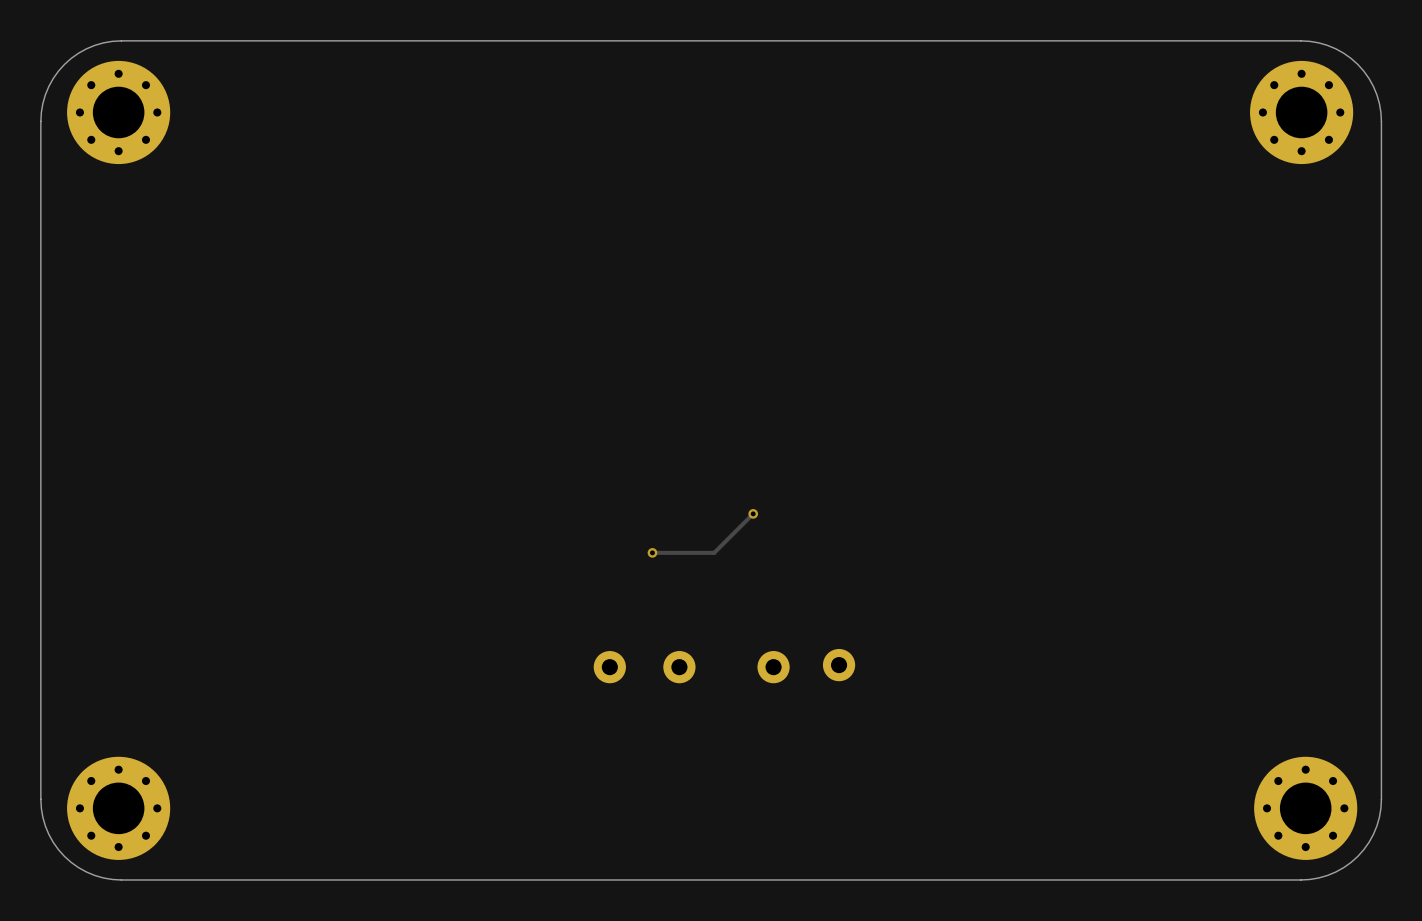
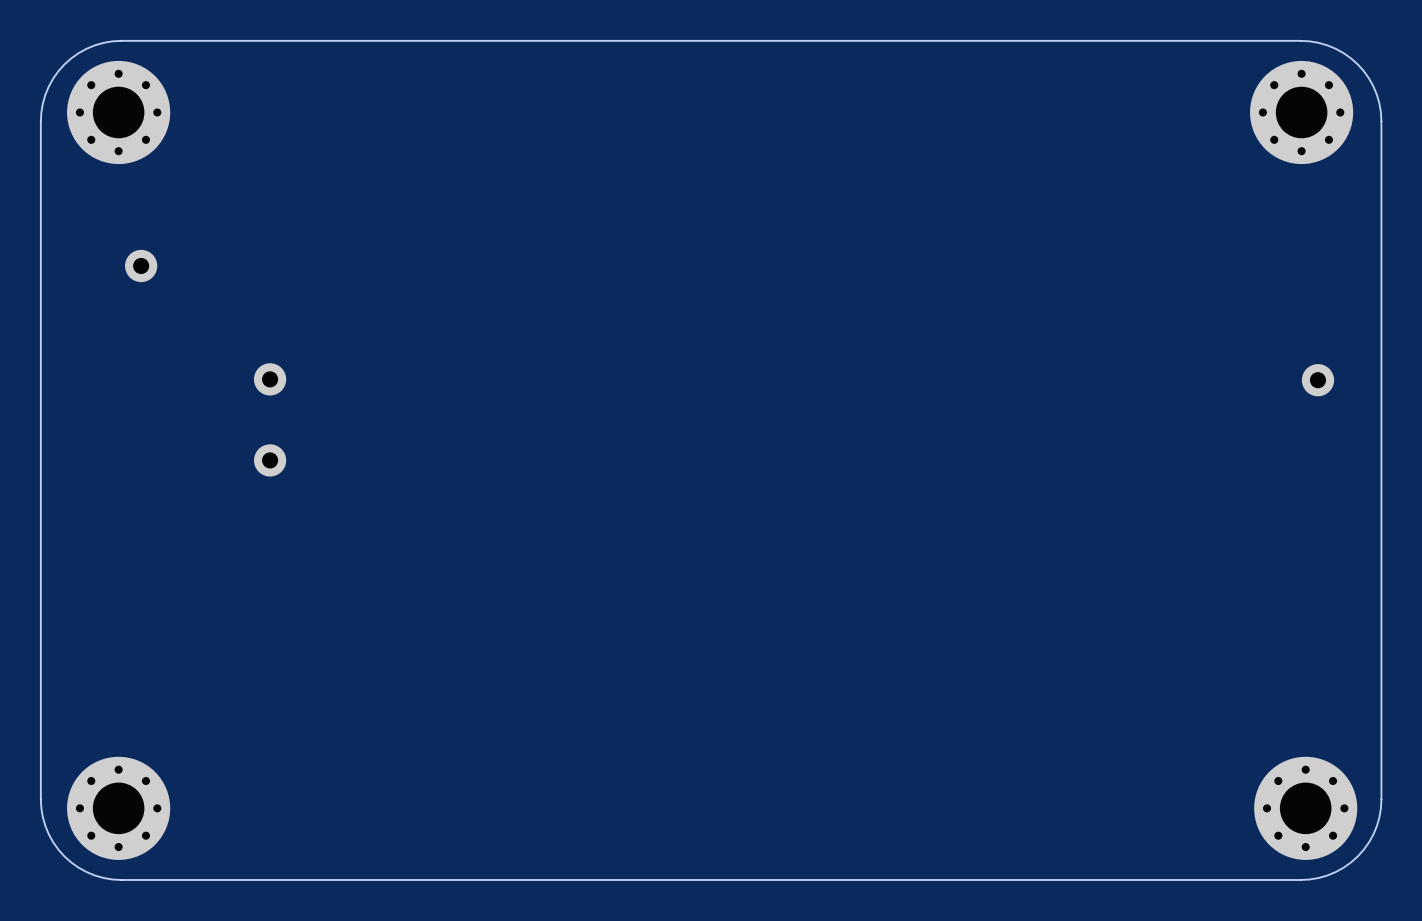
part: none -> (141, 265)
part: none -> (270, 379)
part: none -> (1317, 380)
part: none -> (270, 460)
track: (753, 513) (714, 552) (652, 552) -> none
via: (753, 513) -> none
via: (652, 552) -> none
part: (839, 665) -> none
part: (609, 667) -> none
part: (679, 667) -> none
part: (773, 667) -> none

